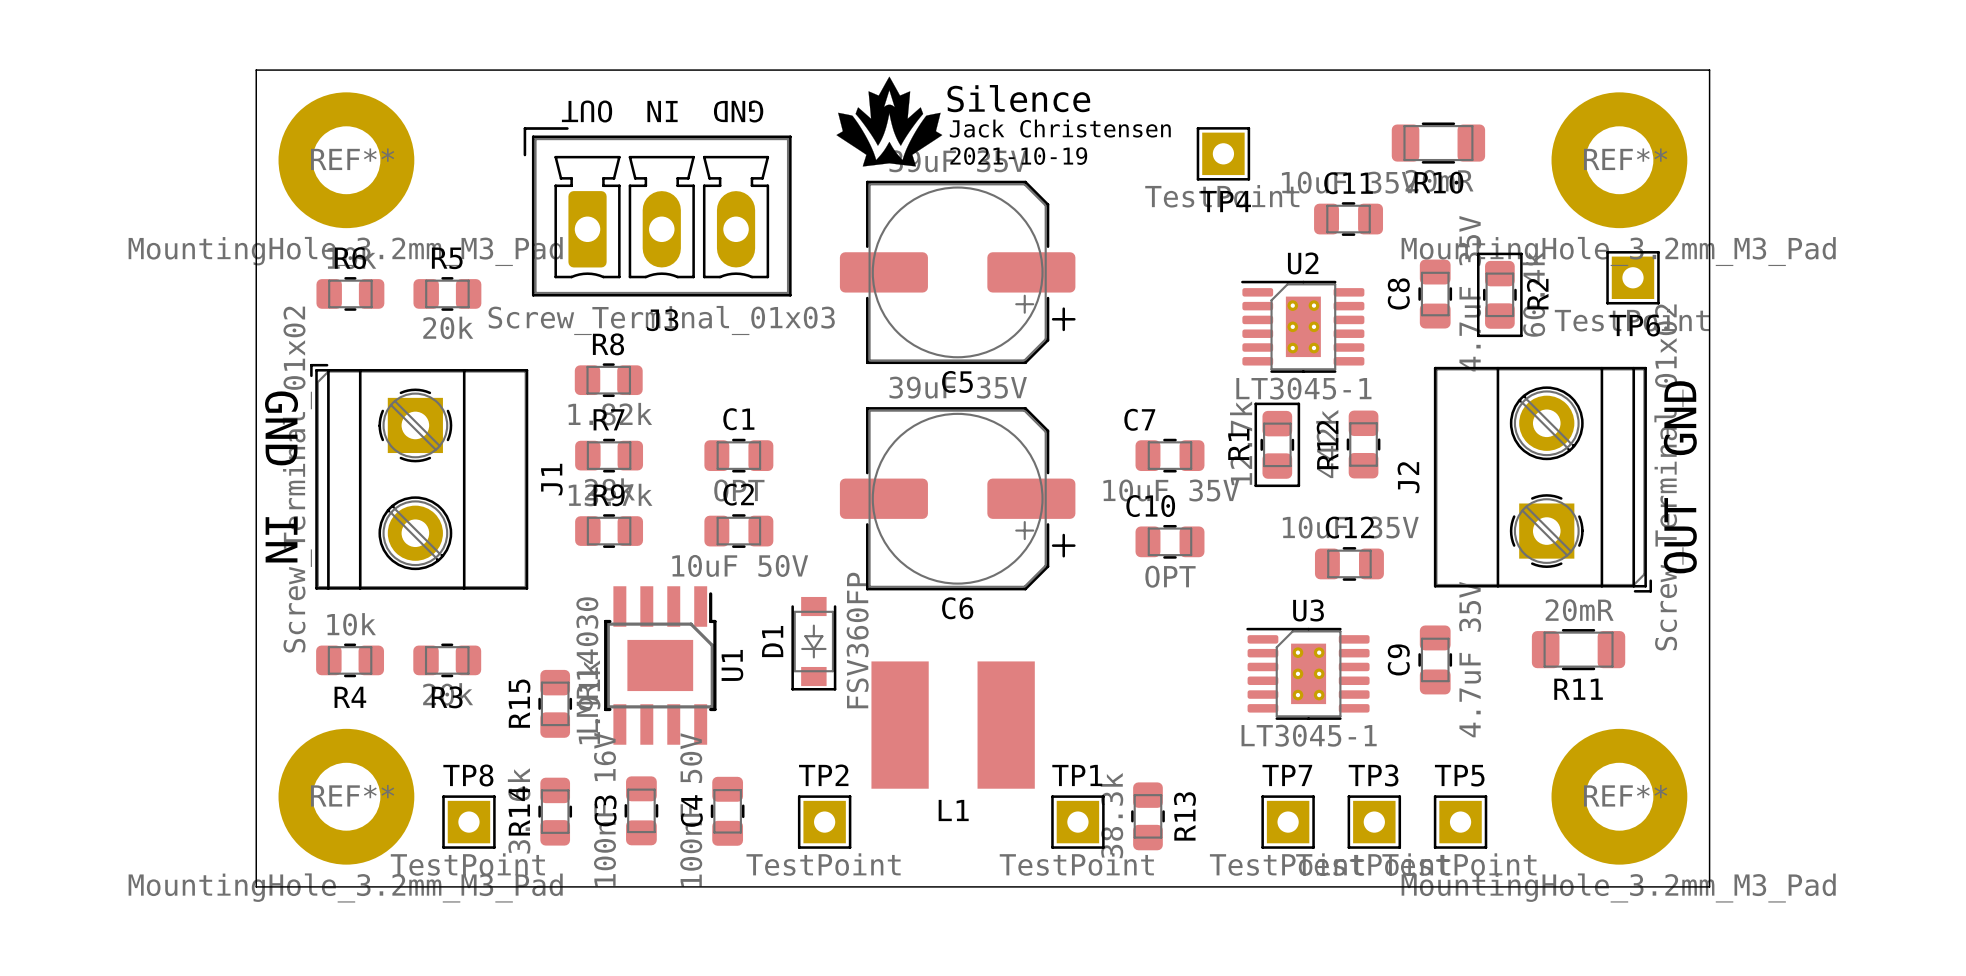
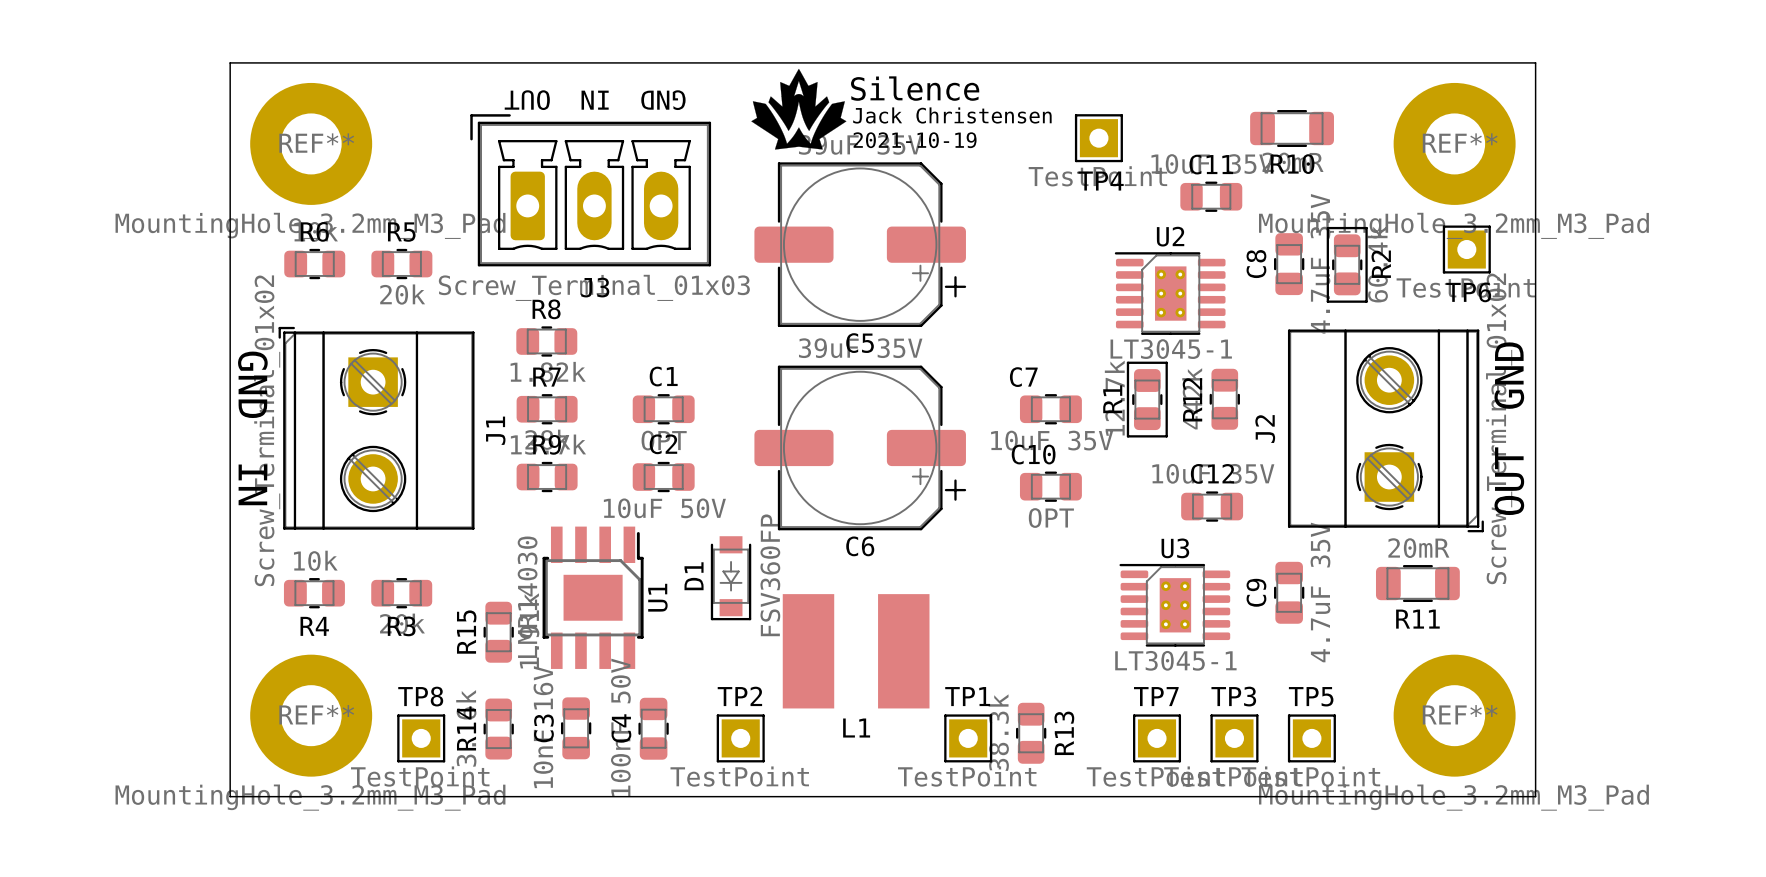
C3 value: 100nF 16V (604, 809) -> 10nF 16V (543, 727)

